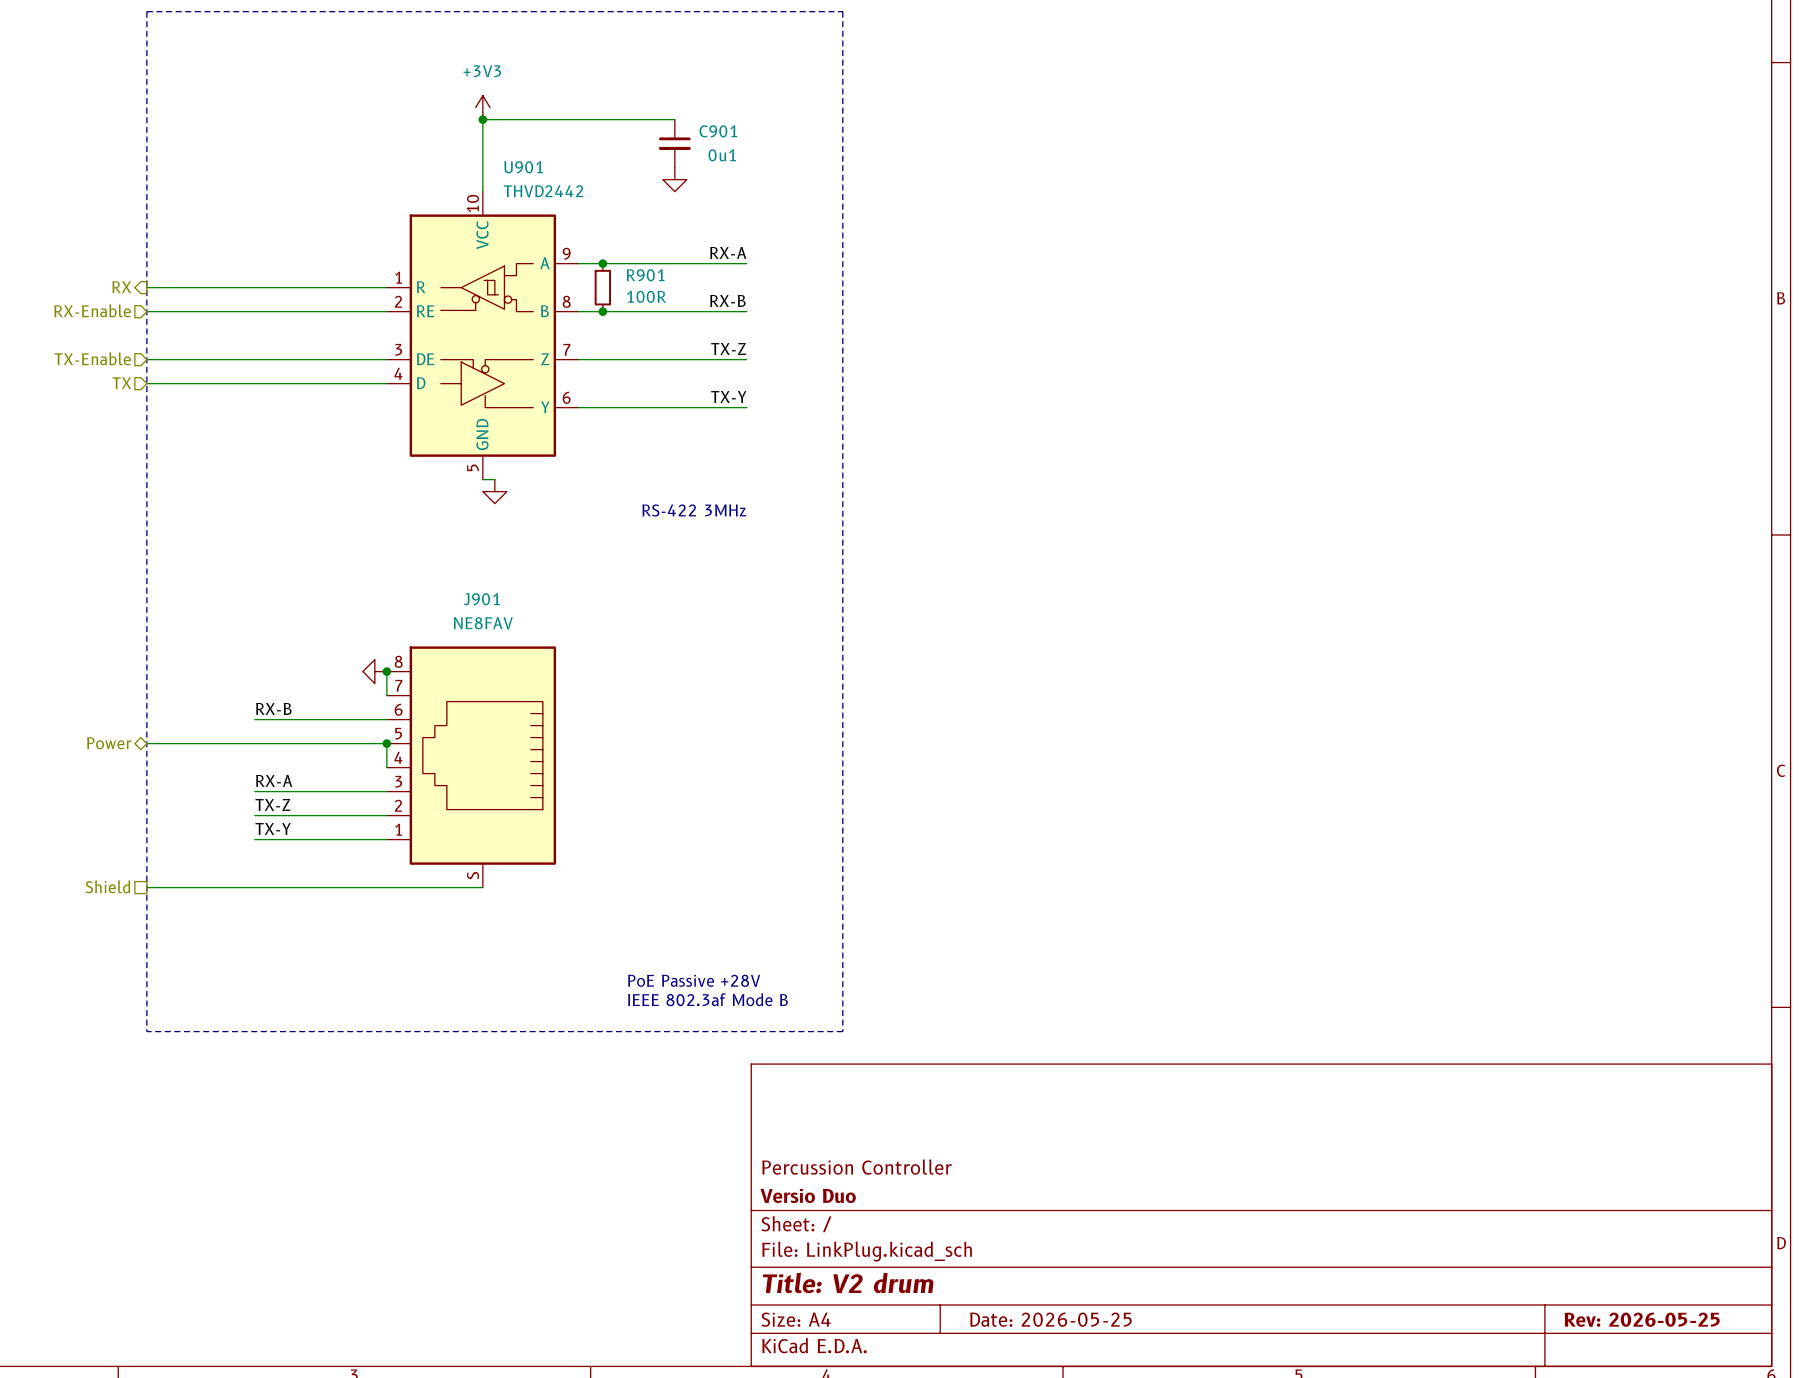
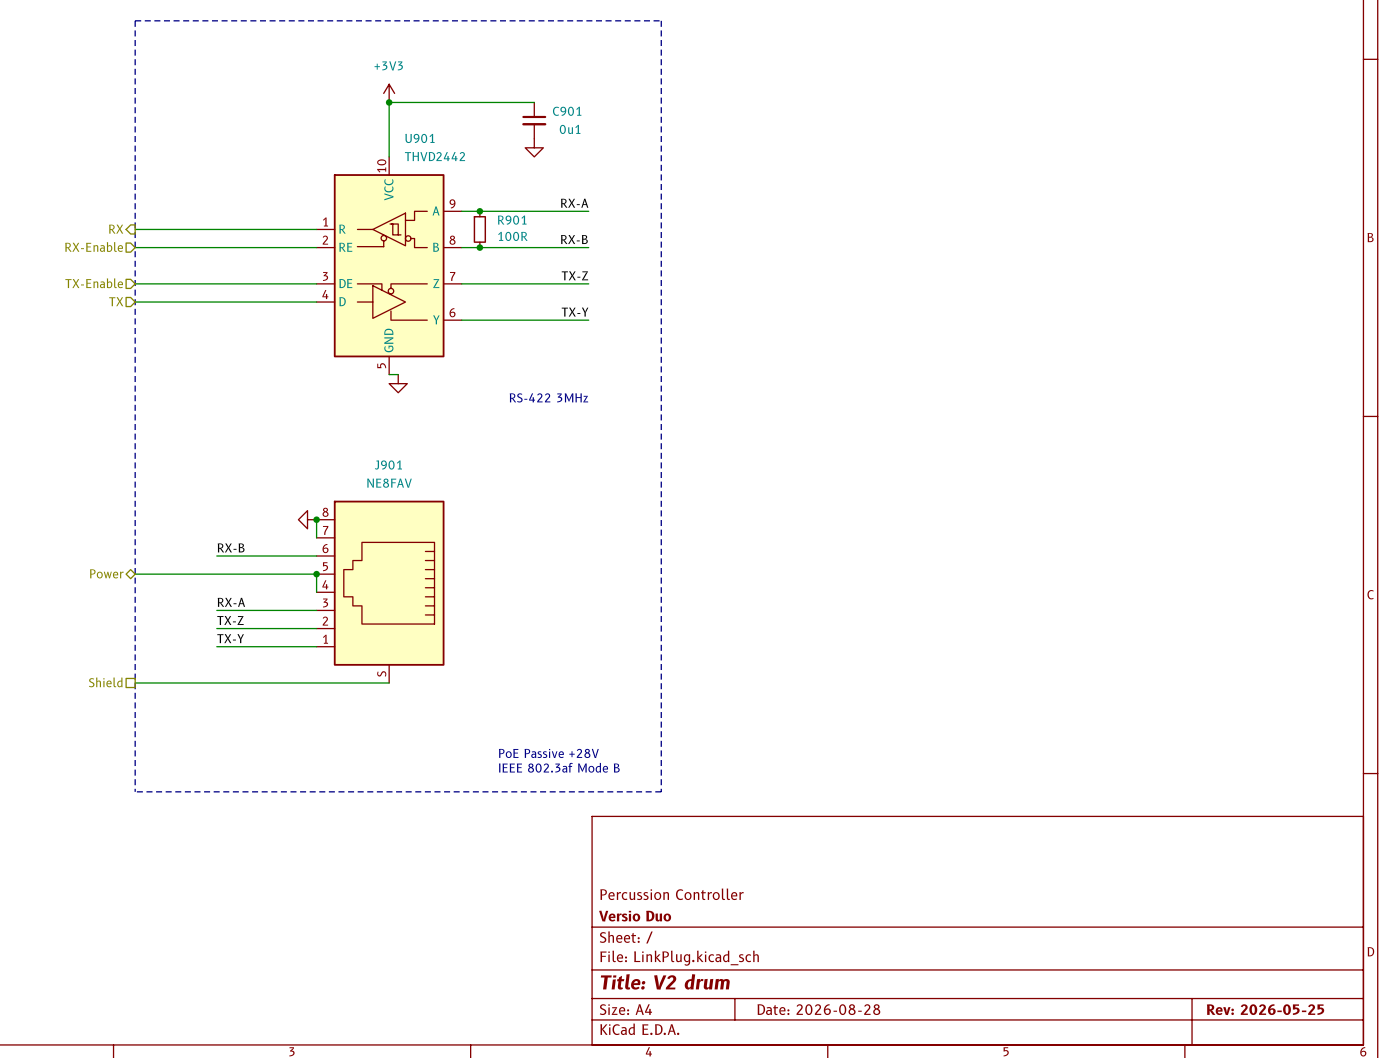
title block: Date: 2026-05-25 (1050, 1319) -> Date: 2026-08-28 (818, 1009)

